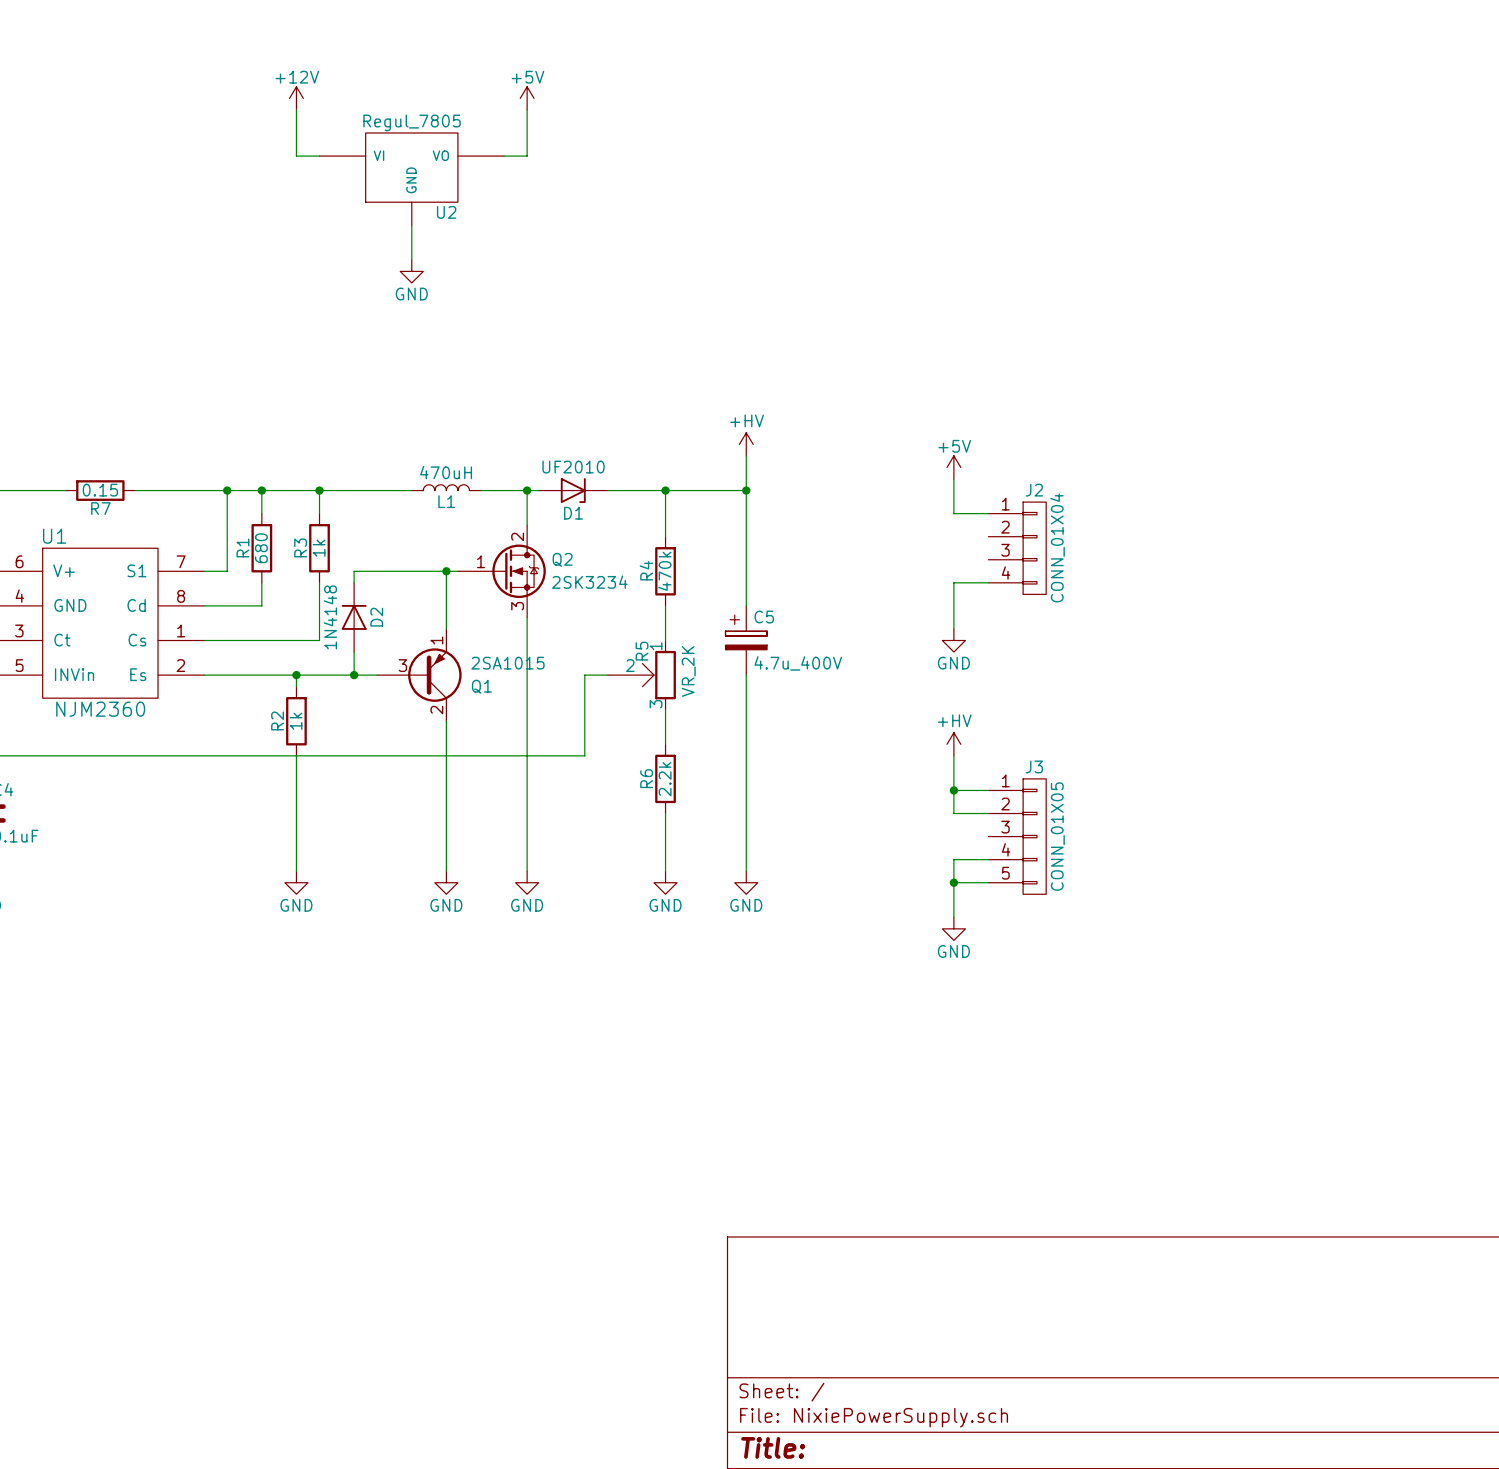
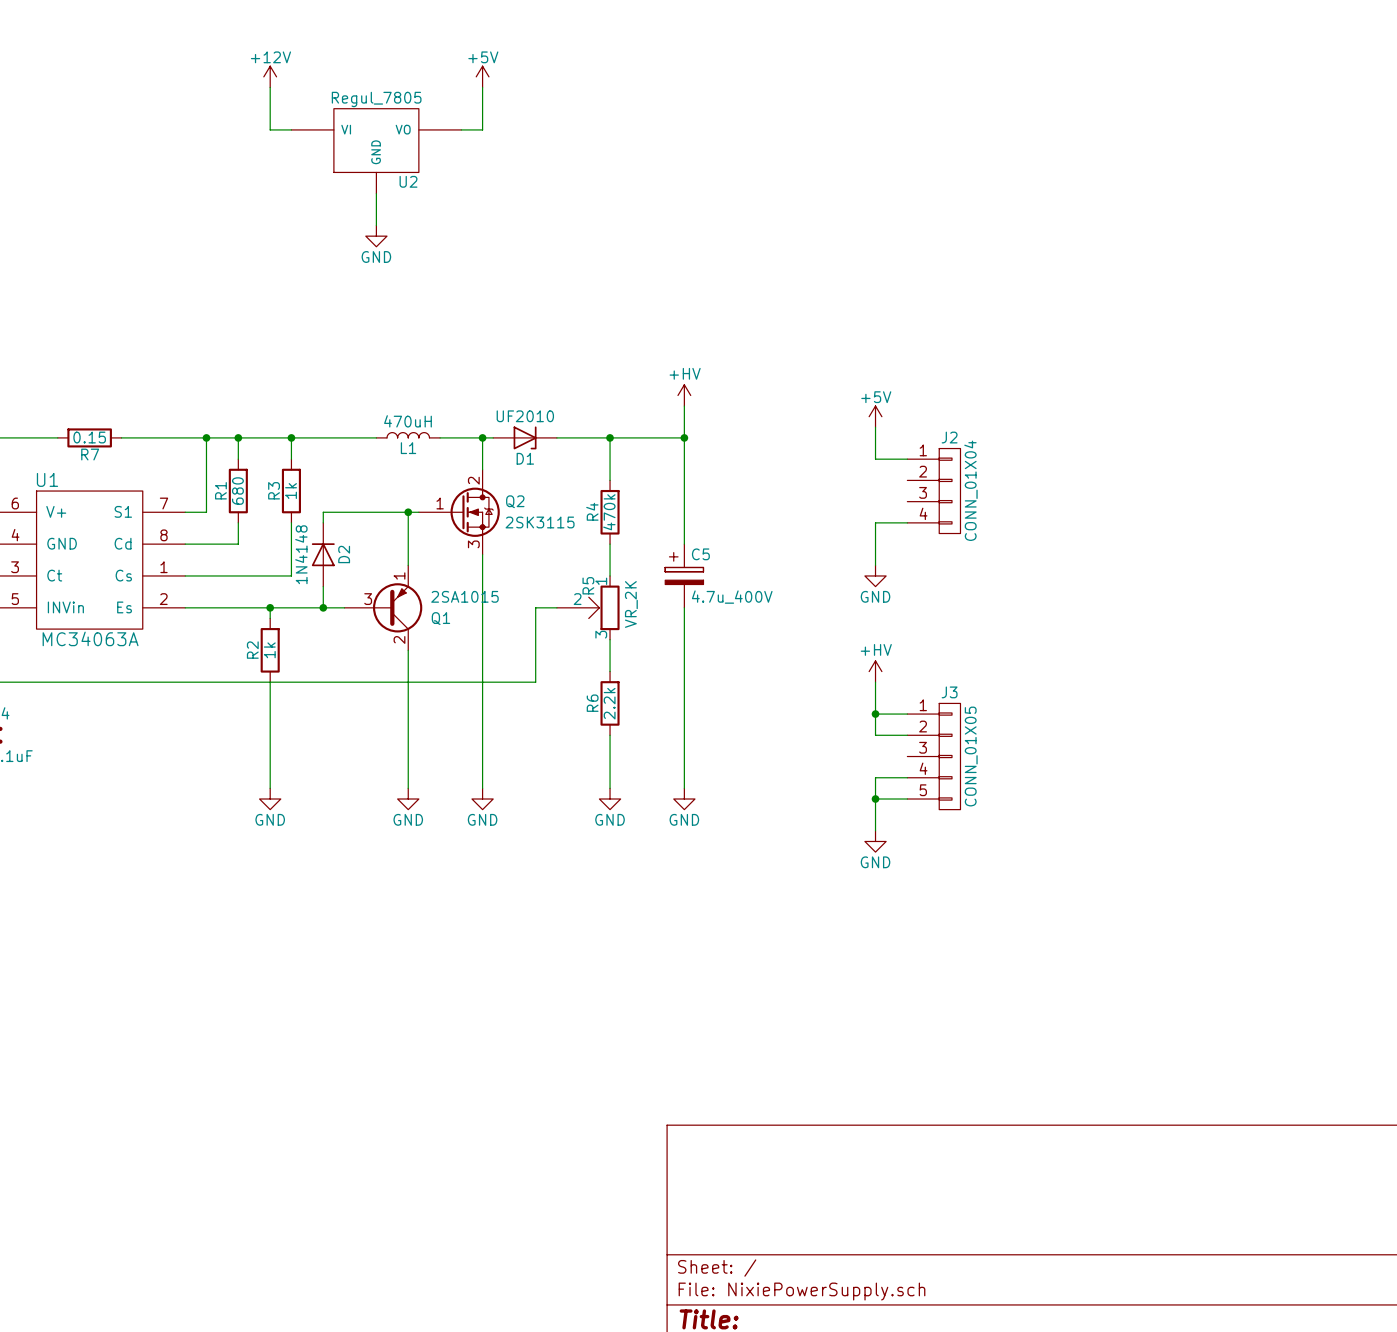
Q2 value: 2SK3234 (589, 582) -> 2SK3115 (540, 522)
U1 value: NJM2360 (100, 709) -> MC34063A (90, 638)

